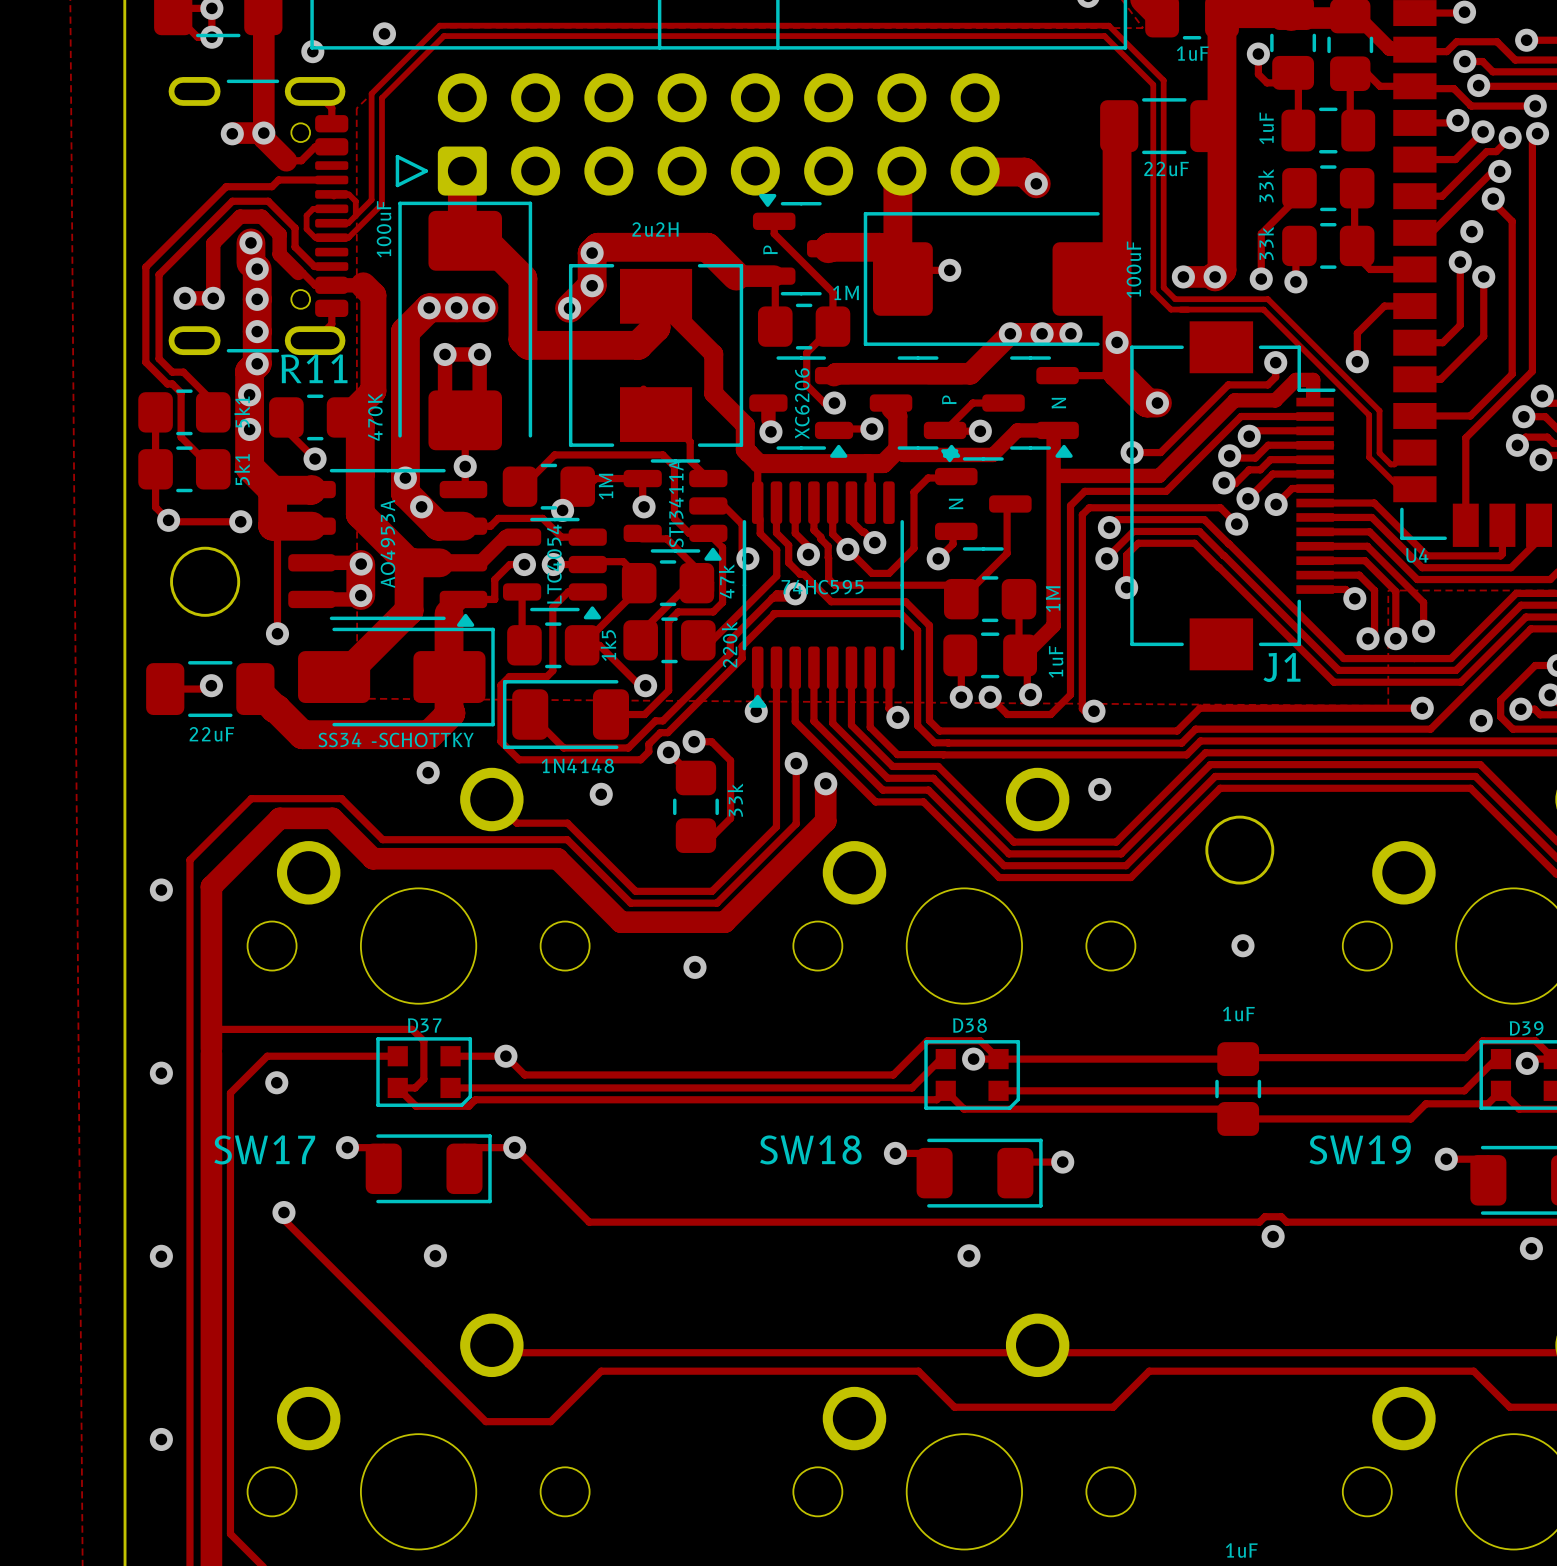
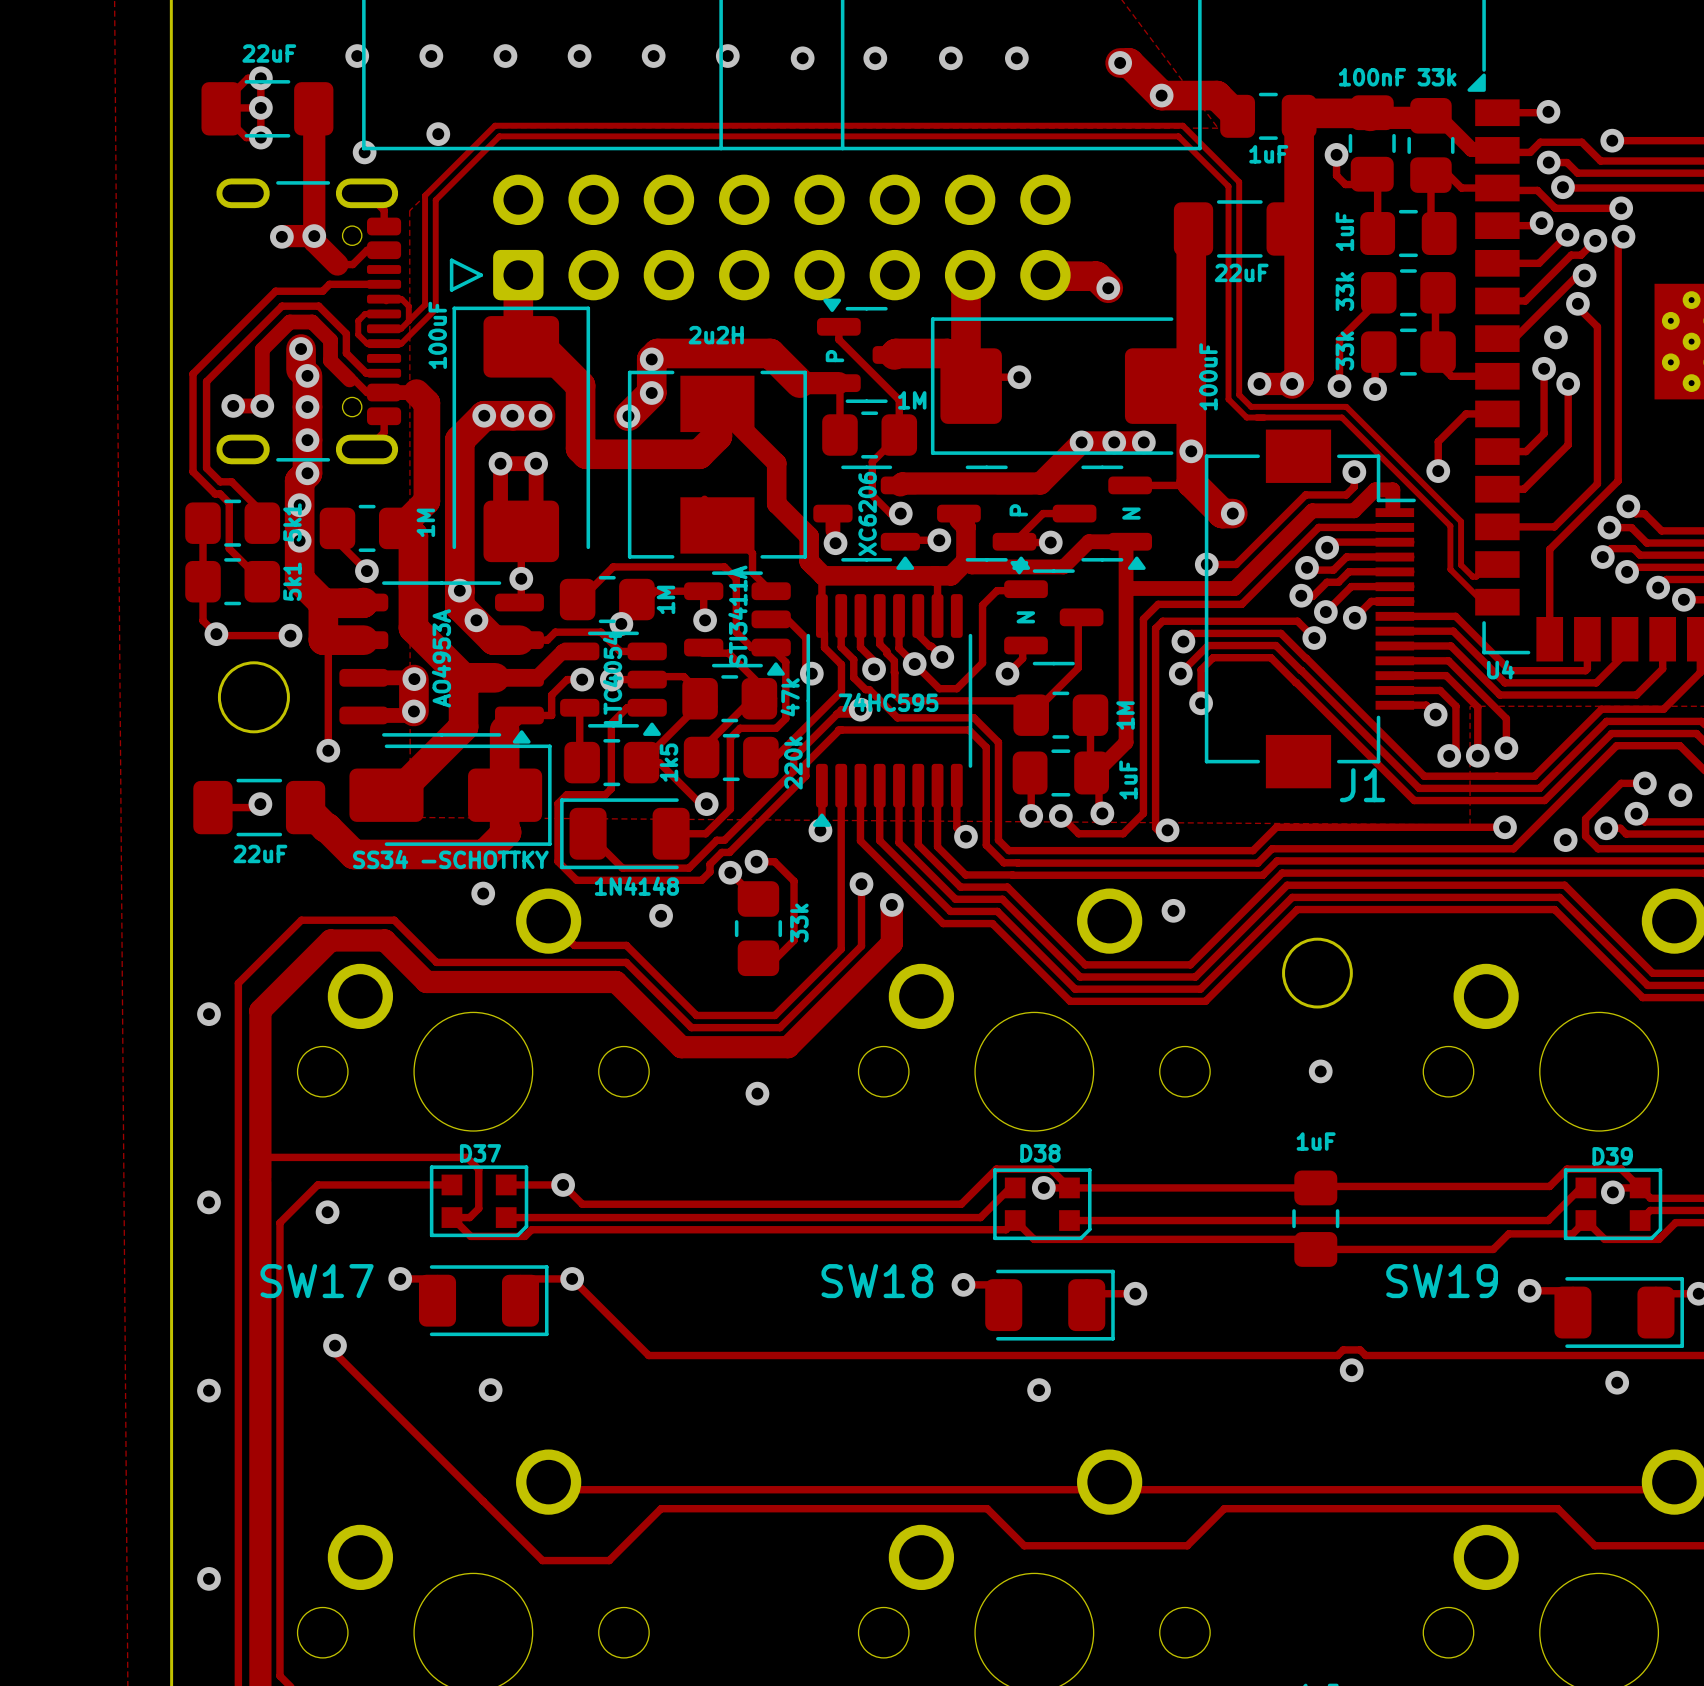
R11 name: R11 (314, 368) -> none
text: 470K (375, 417) -> 1M (425, 522)

